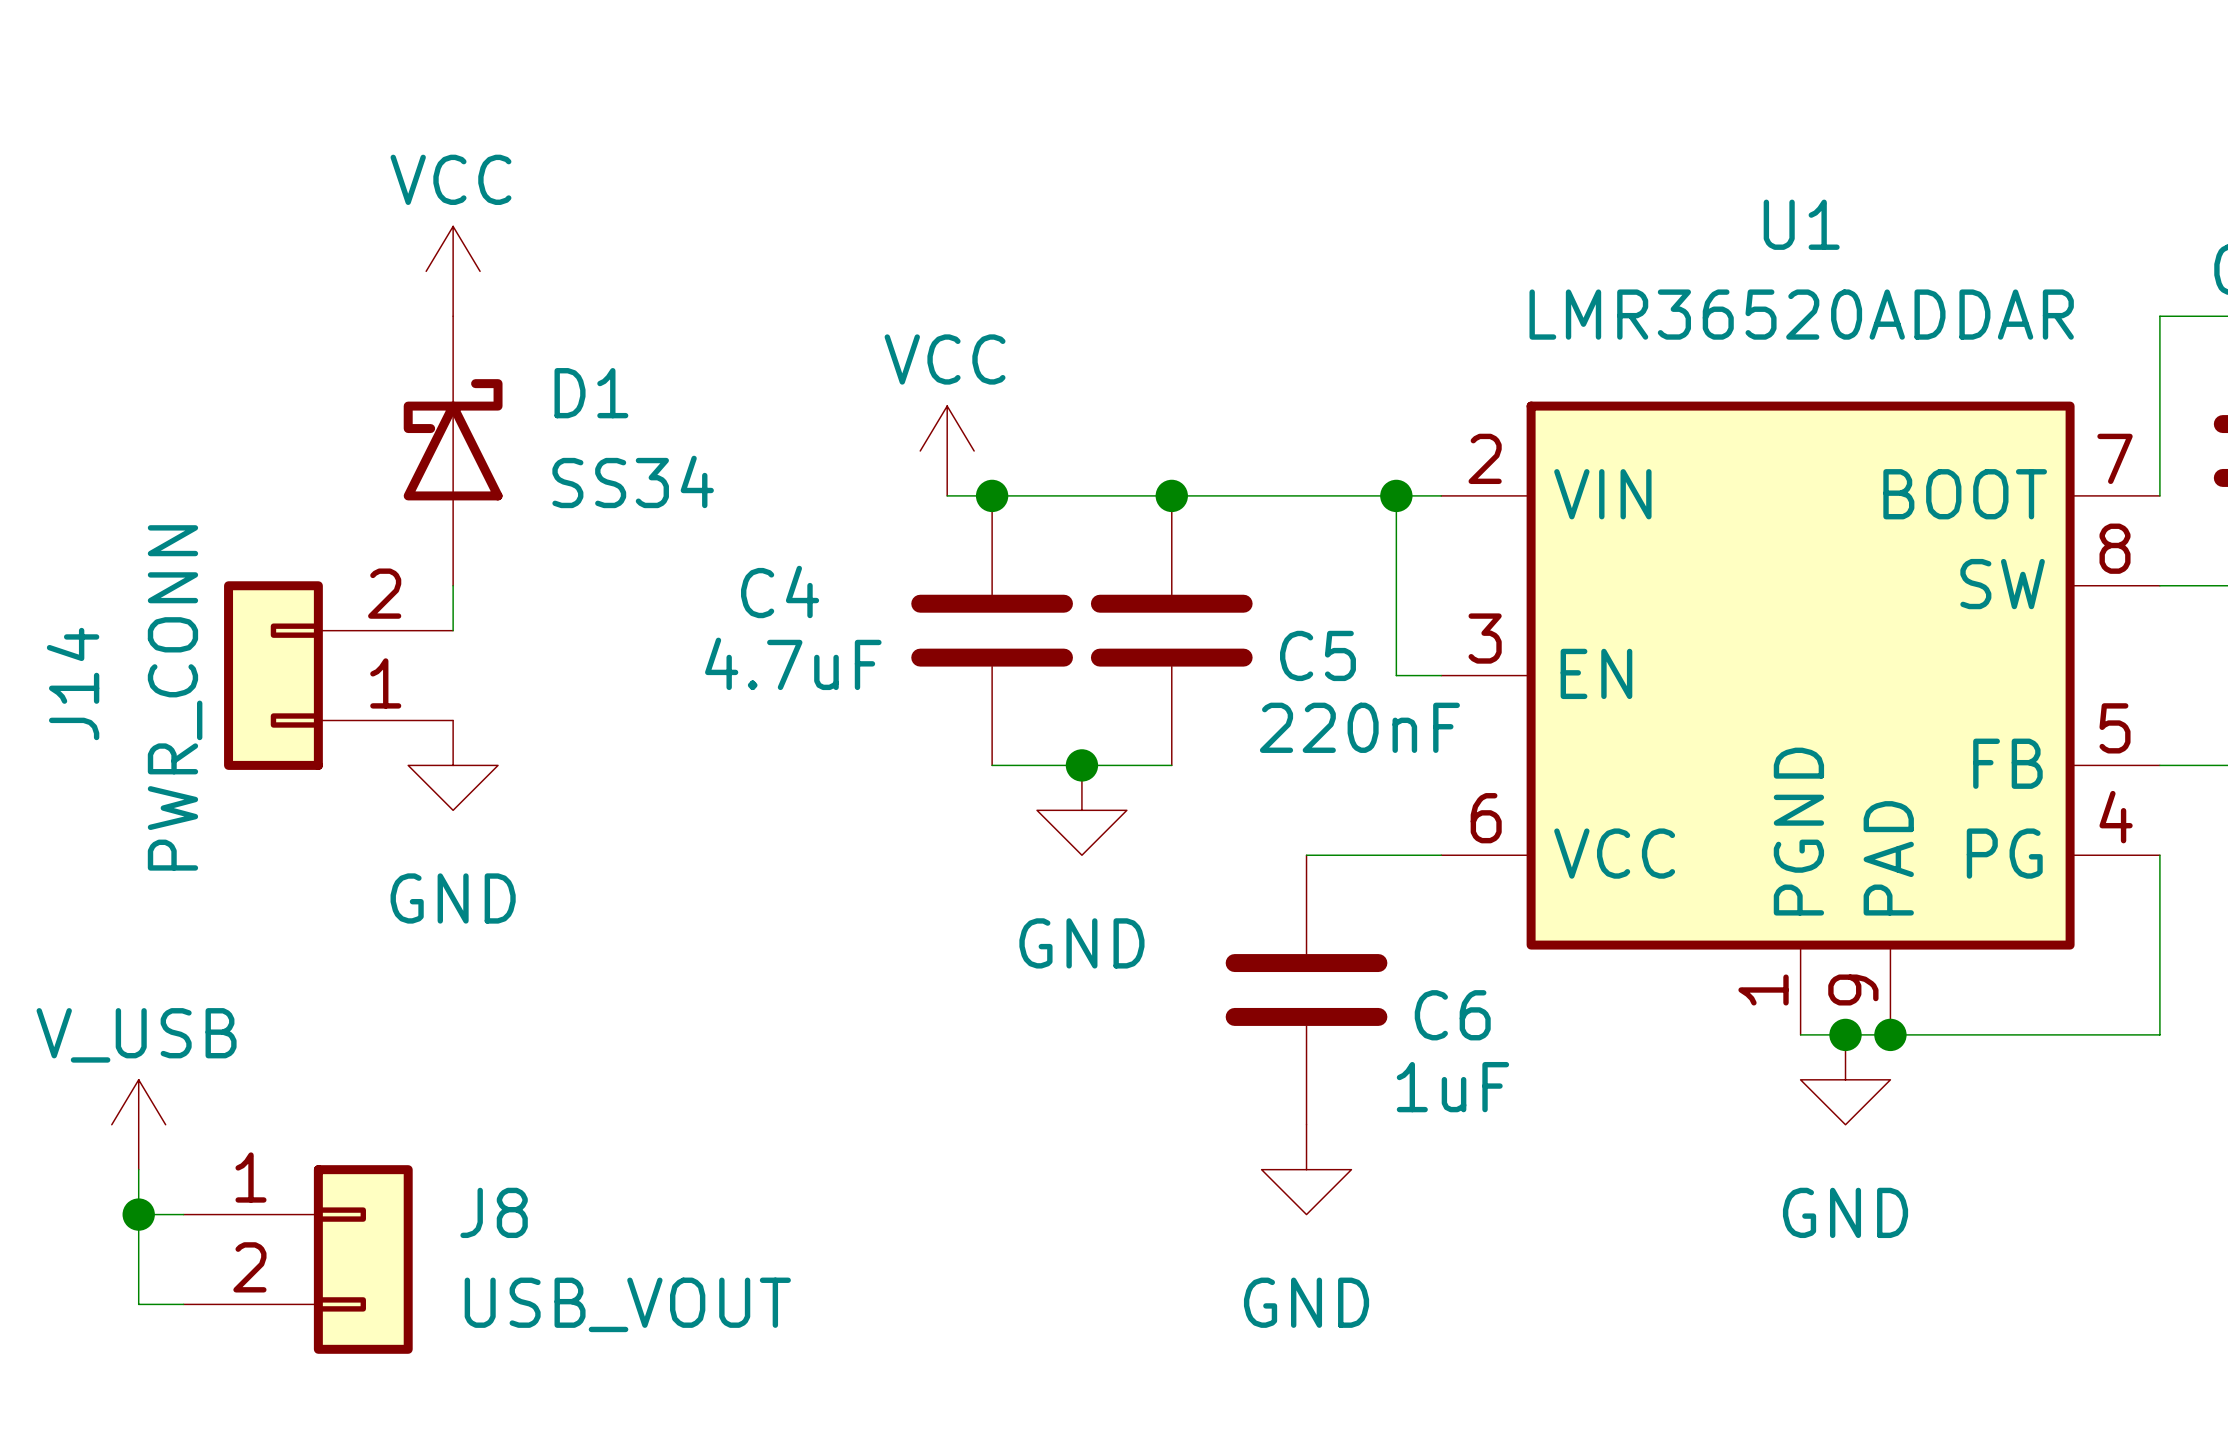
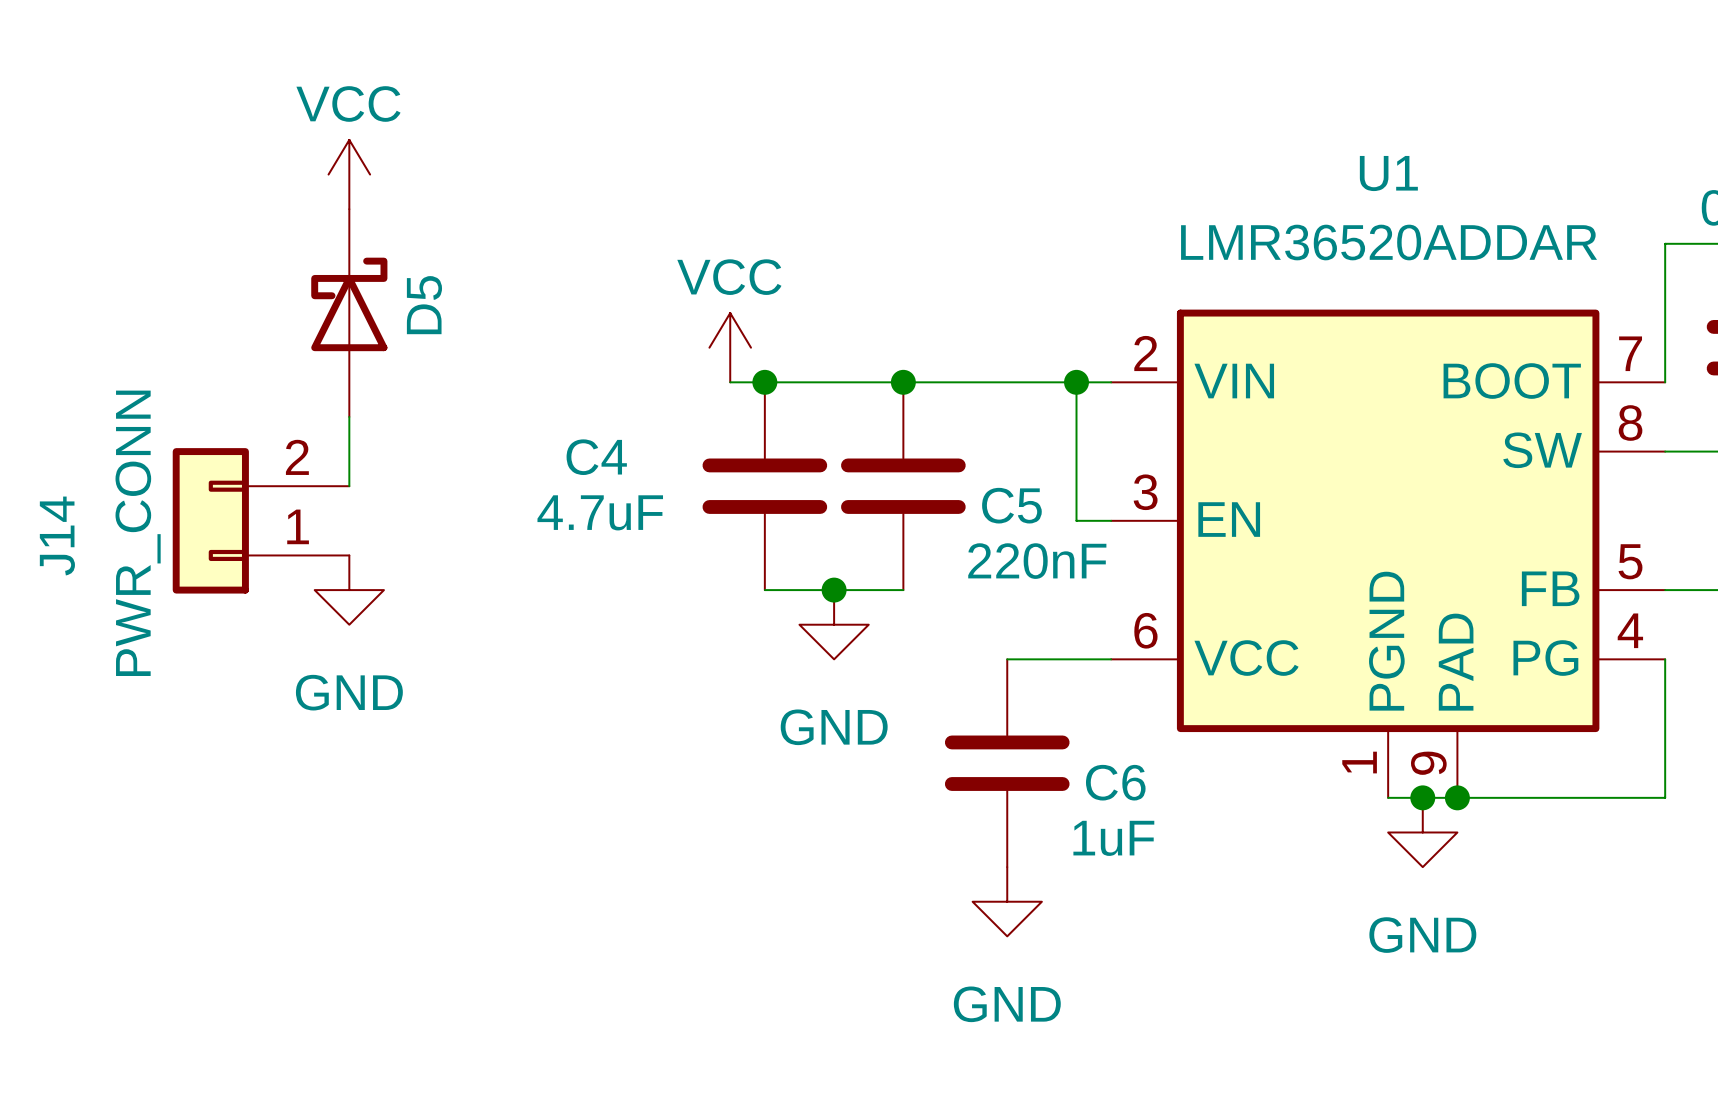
power symbol position: VCC (453, 271) -> VCC (349, 174)
D5: none -> (349, 313)
D1: SS34 (453, 451) -> none
power symbol: V_USB (138, 1124) -> none
wire: (138, 1169) (138, 1304) (183, 1304) -> none
wire: (138, 1214) (183, 1214) -> none
junction: (138, 1214) -> none
J8: USB_VOUT (298, 1259) -> none

